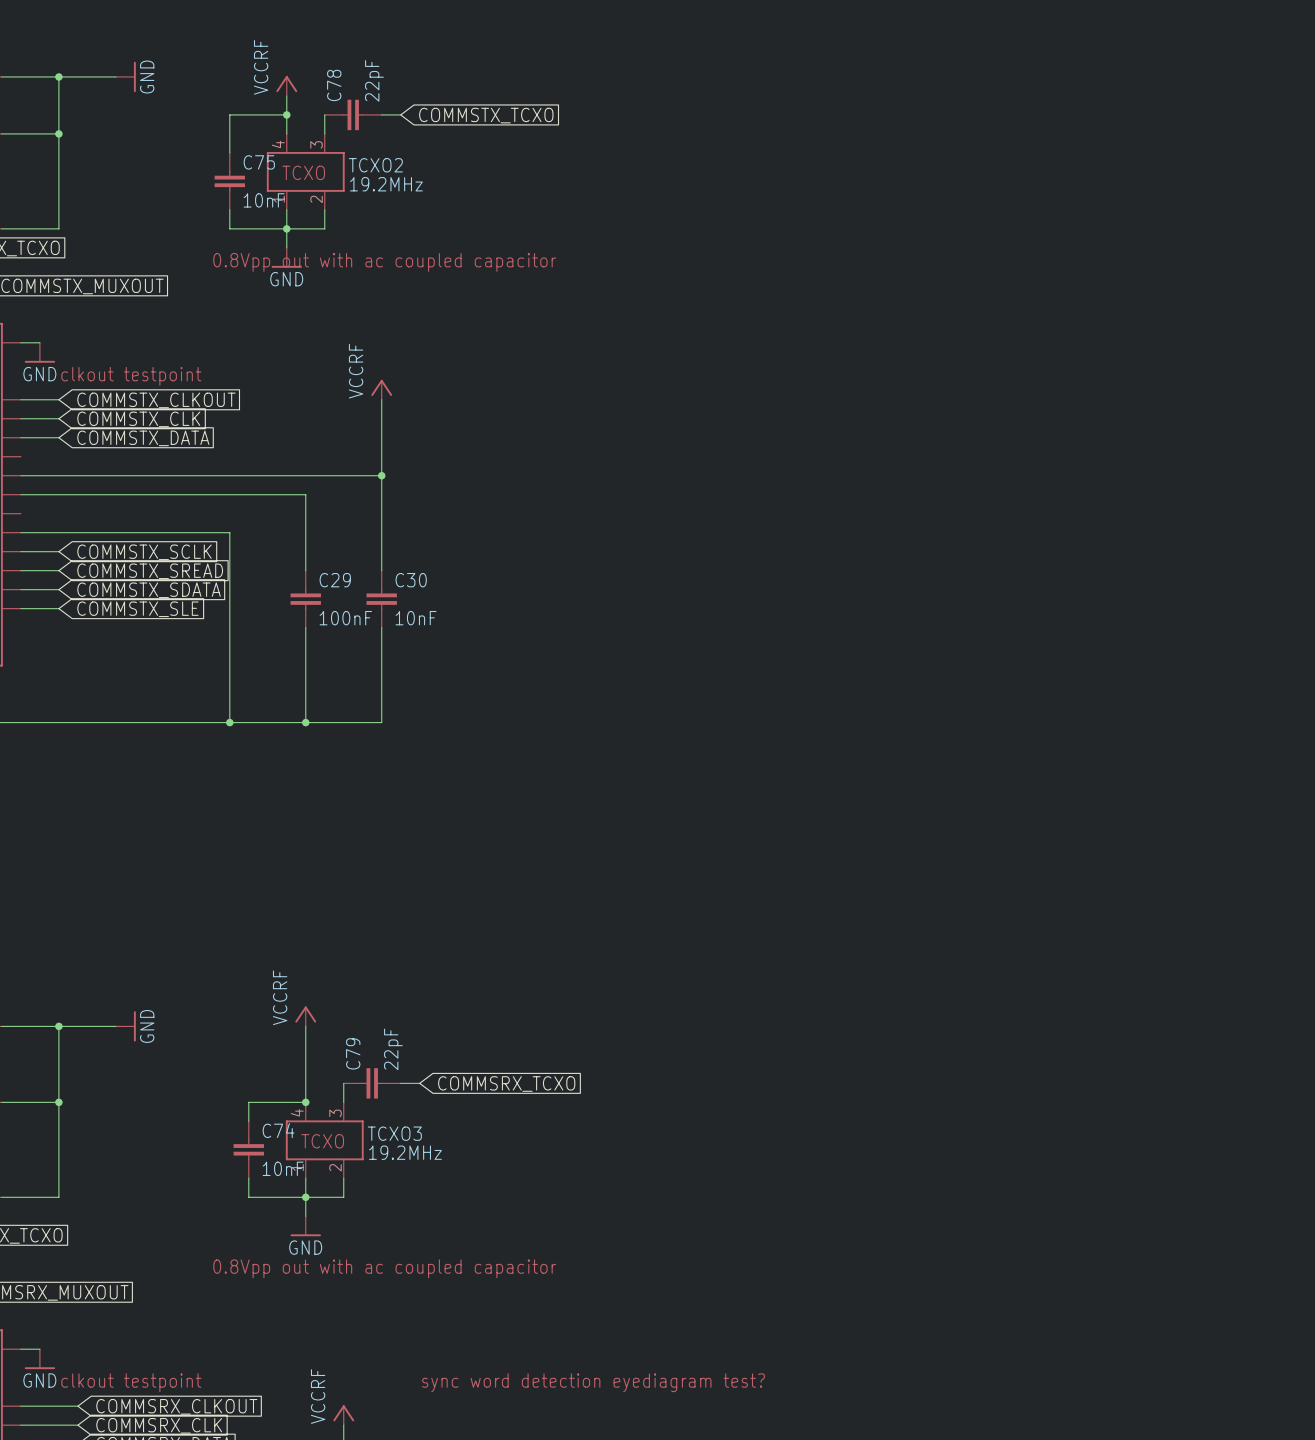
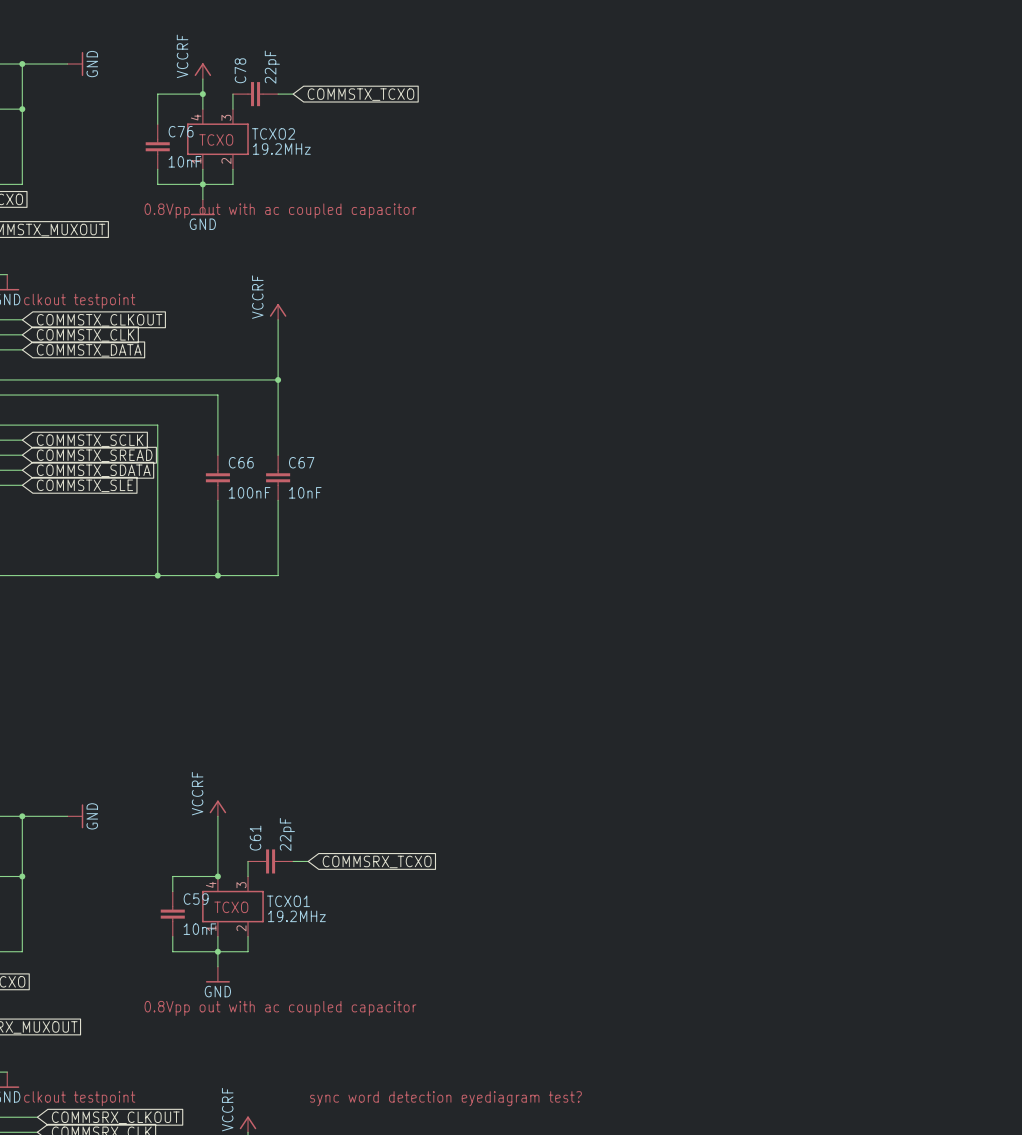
C75 name: C75 (259, 162) -> C76 (181, 131)
C29 name: C29 (335, 580) -> C66 (241, 462)
C30 name: C30 (411, 580) -> C67 (301, 462)
C79 name: C79 (353, 1053) -> C61 (255, 838)
C74 name: C74 (278, 1130) -> C59 (196, 899)
TCXO3 name: TCXO3 (394, 1133) -> TCXO1 (288, 901)

